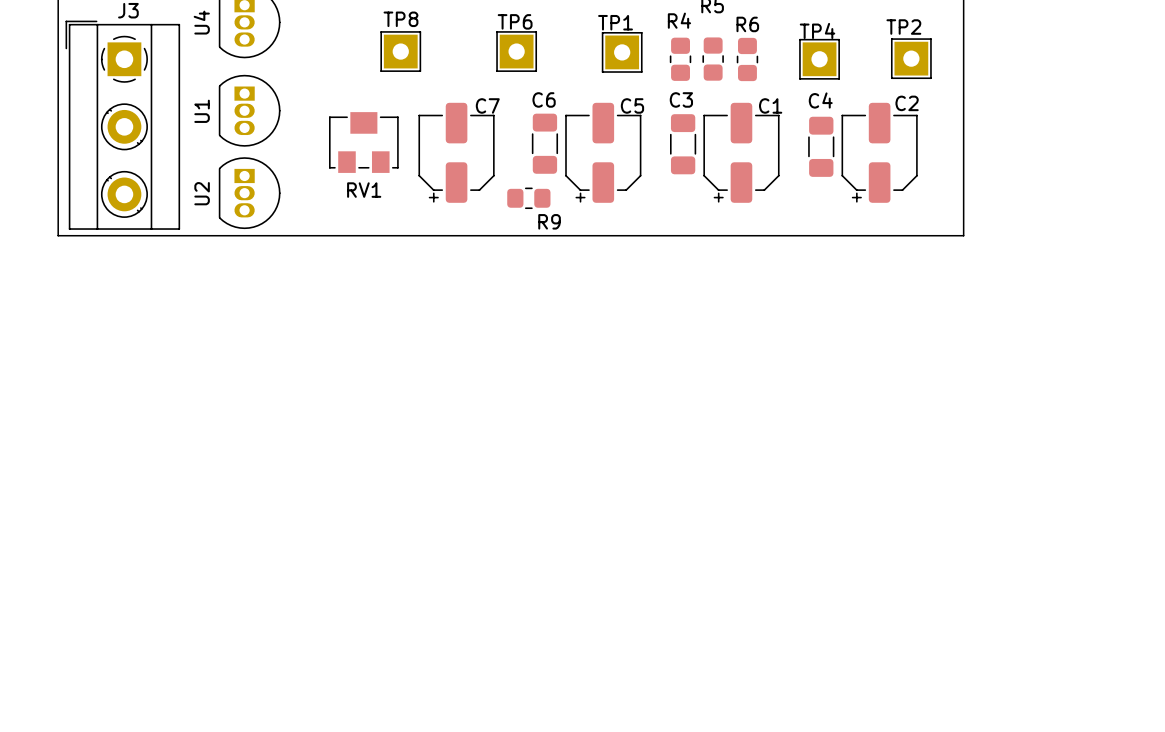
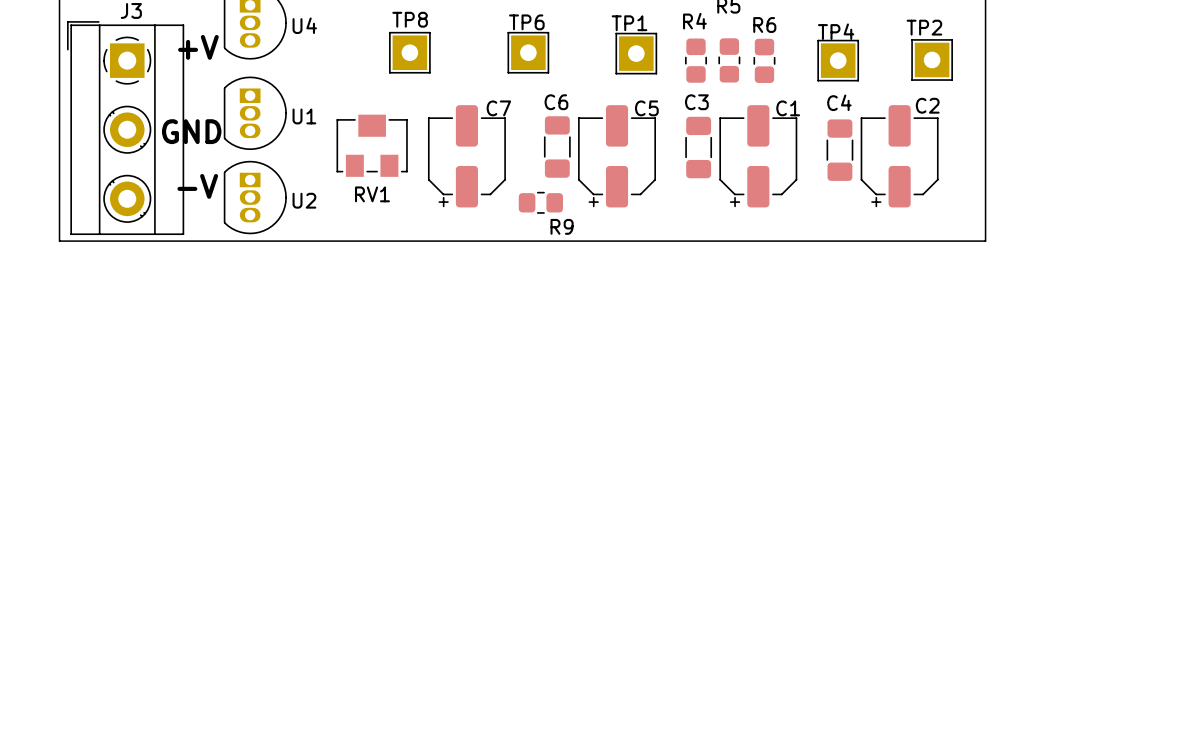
U4 name rotation: 0° (201, 22) -> 90° clockwise (304, 25)
U4 name position: U4 (201, 22) -> U4 (304, 25)
text: none -> +V (198, 47)
U1 name rotation: 0° (202, 111) -> 90° clockwise (304, 116)
U1 name position: U1 (202, 111) -> U1 (304, 116)
text: none -> GND (191, 131)
text: none -> -V (197, 186)
U2 name rotation: 0° (202, 193) -> 90° clockwise (304, 200)
U2 name position: U2 (202, 193) -> U2 (304, 200)

